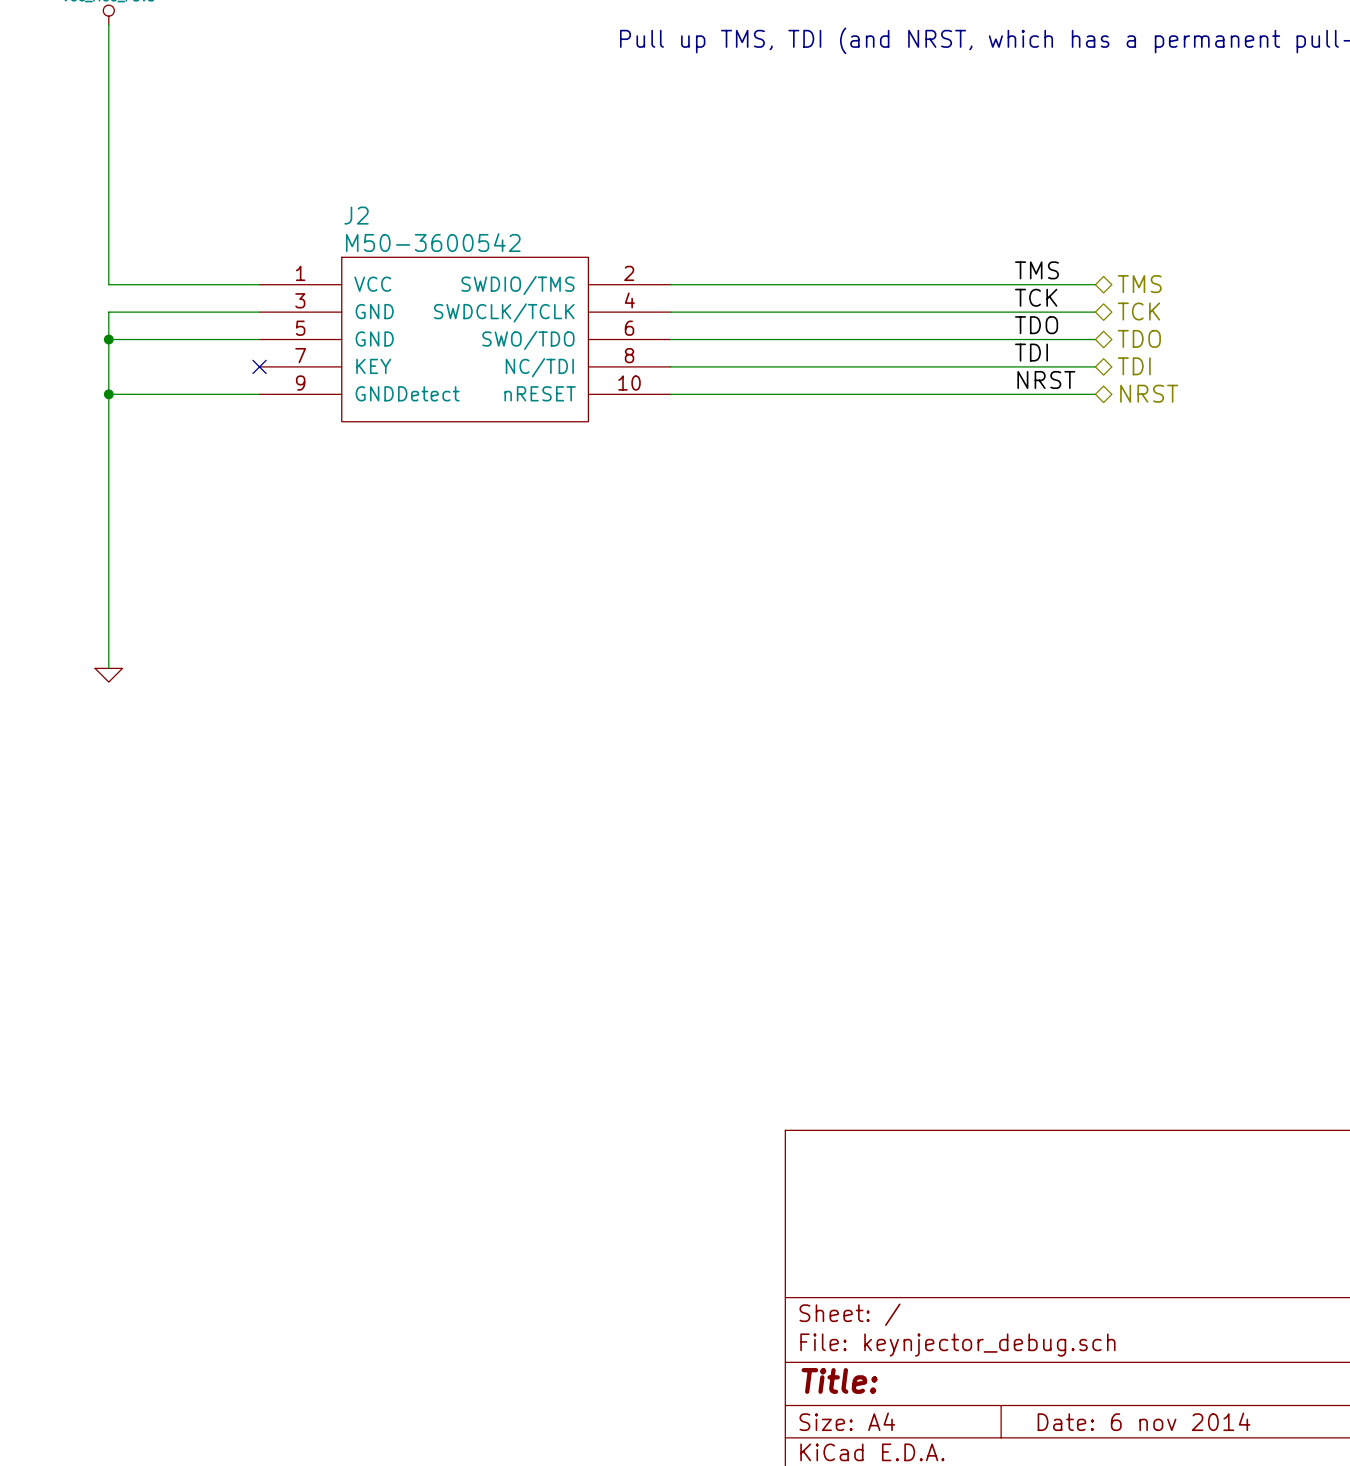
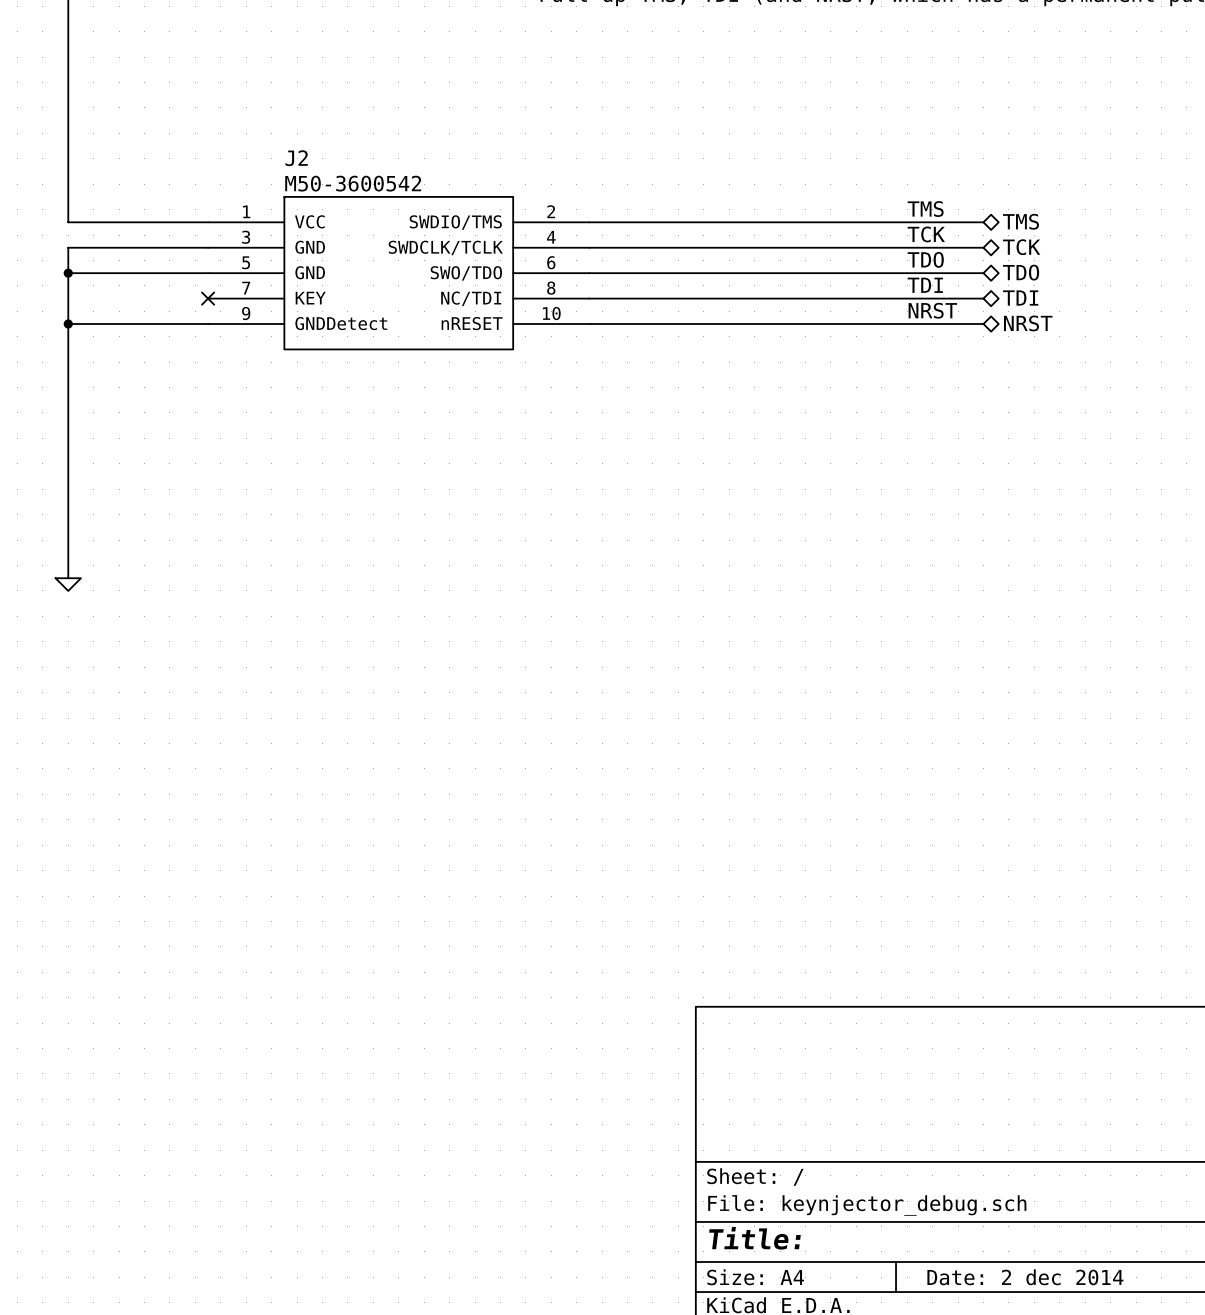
title block: Date: 6 nov 2014 (1144, 1421) -> Date: 2 dec 2014 (1025, 1277)

